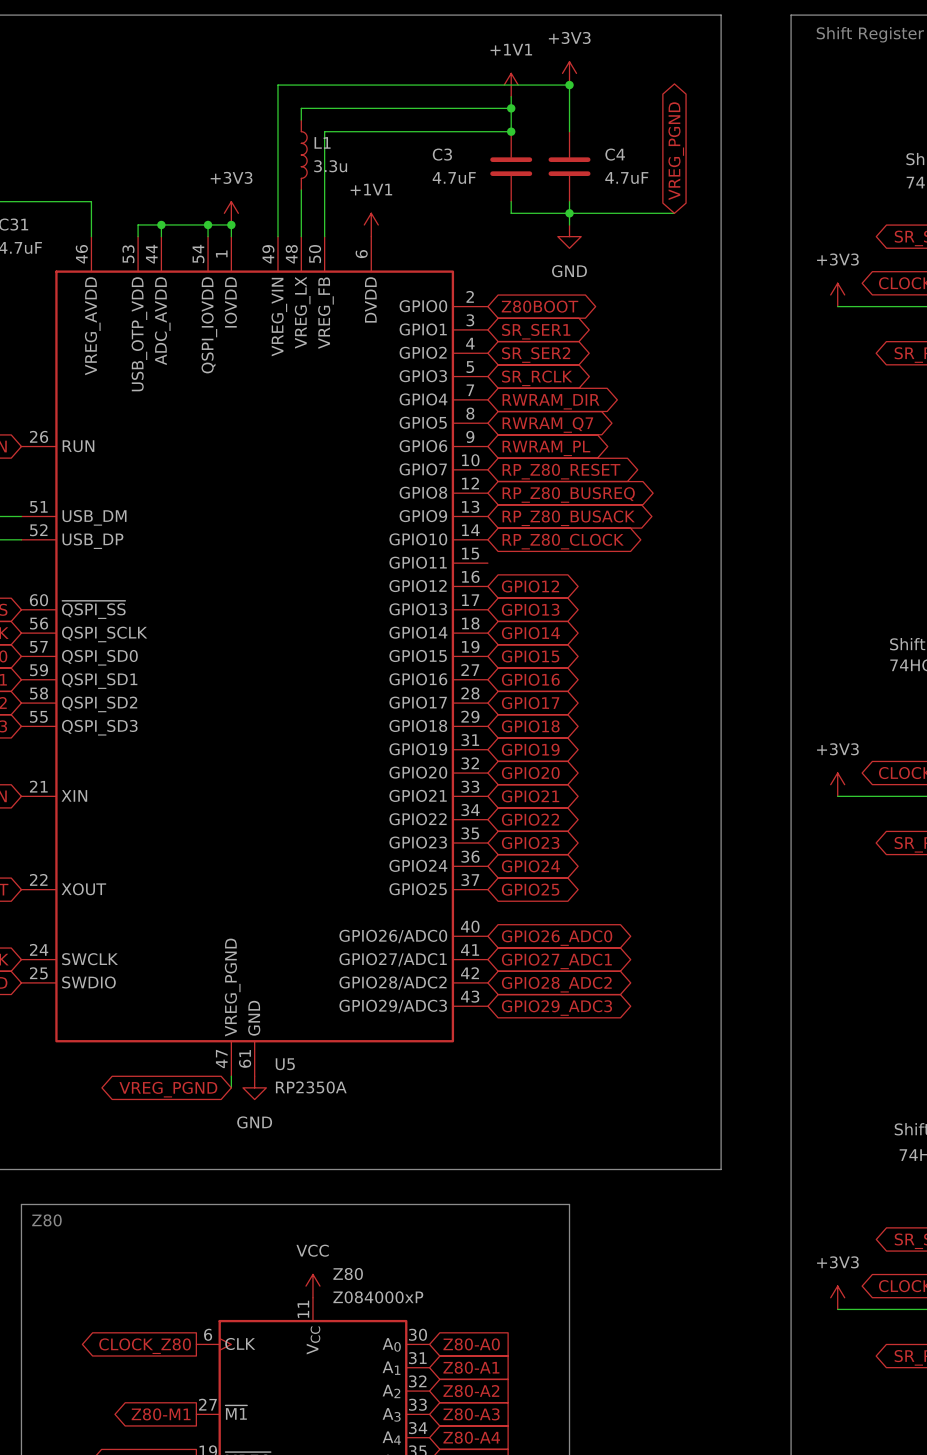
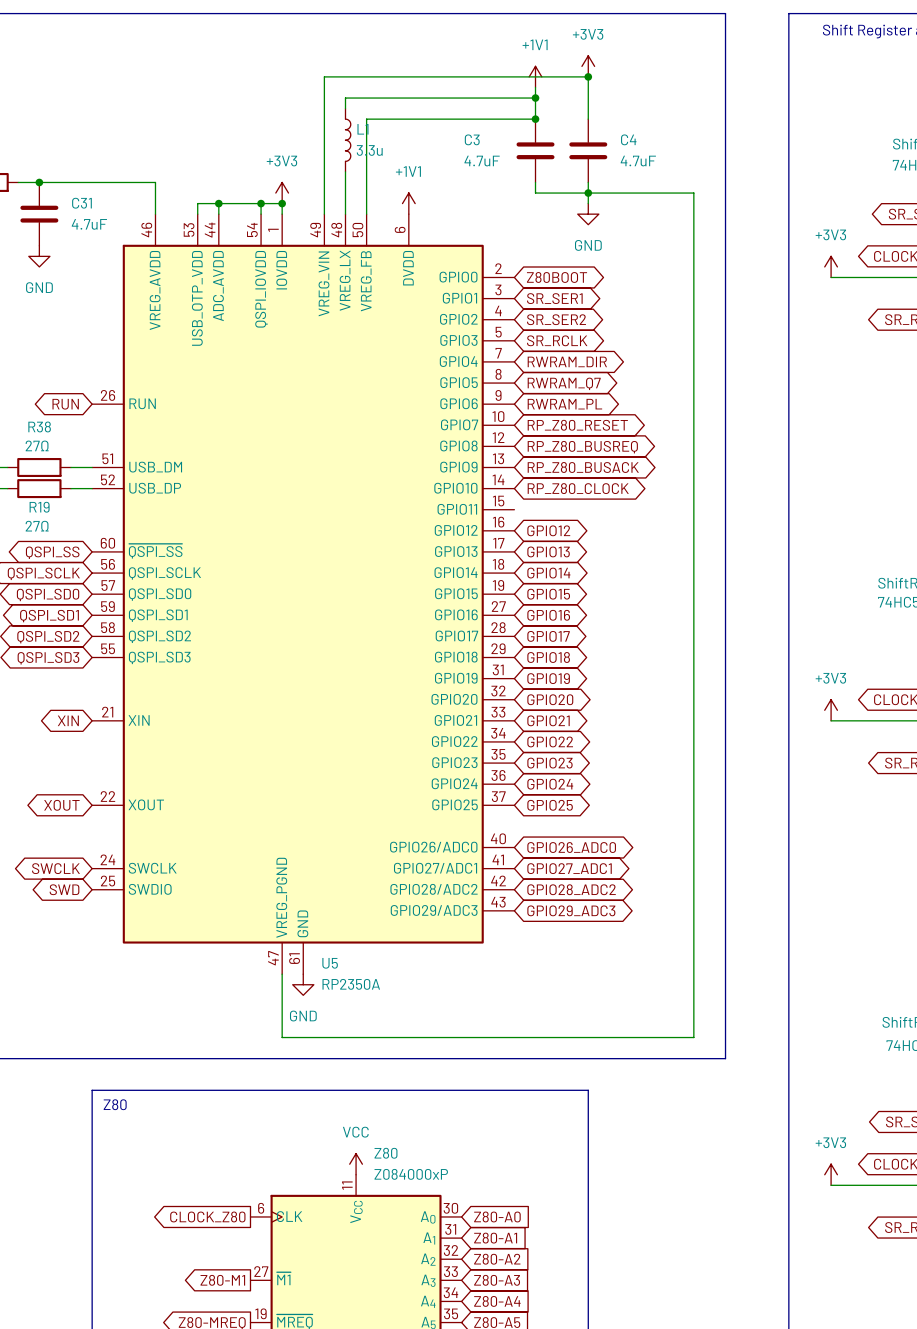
global label: VREG_PGND (676, 151) -> none
wire: none -> (683, 193) (693, 193) (693, 1037) (282, 1037) (282, 984)
global label: VREG_PGND (168, 1089) -> none

